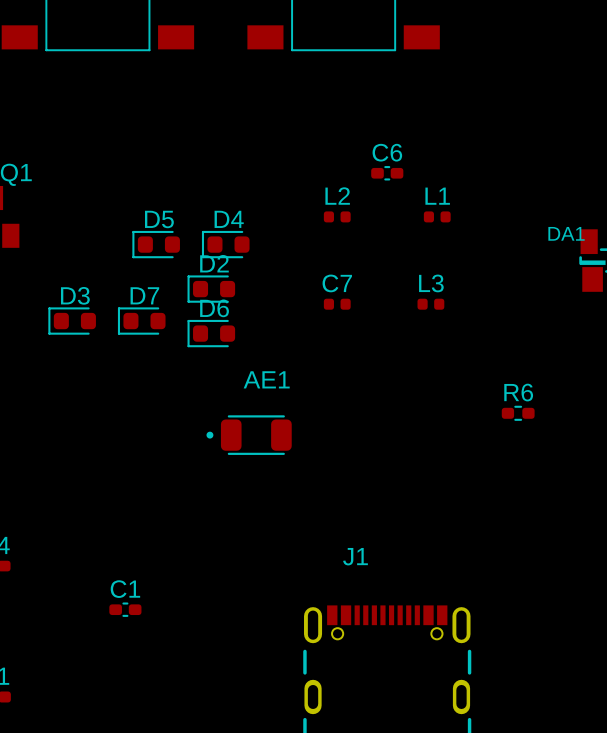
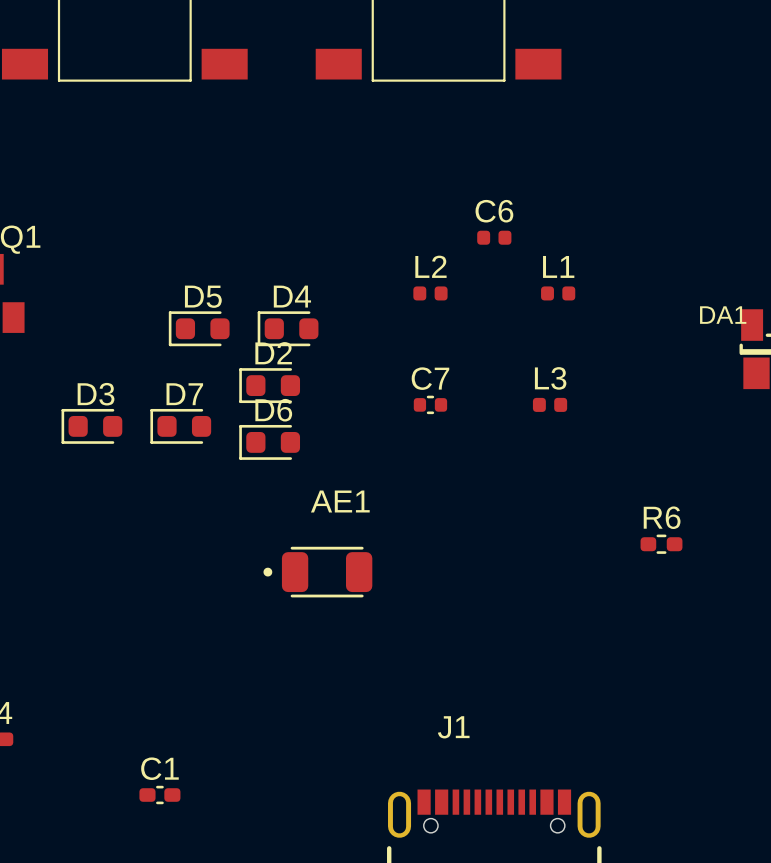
C6 footprint: [371, 166, 404, 181] -> [477, 230, 512, 245]
C7 footprint: [323, 298, 351, 310] -> [413, 395, 448, 415]

